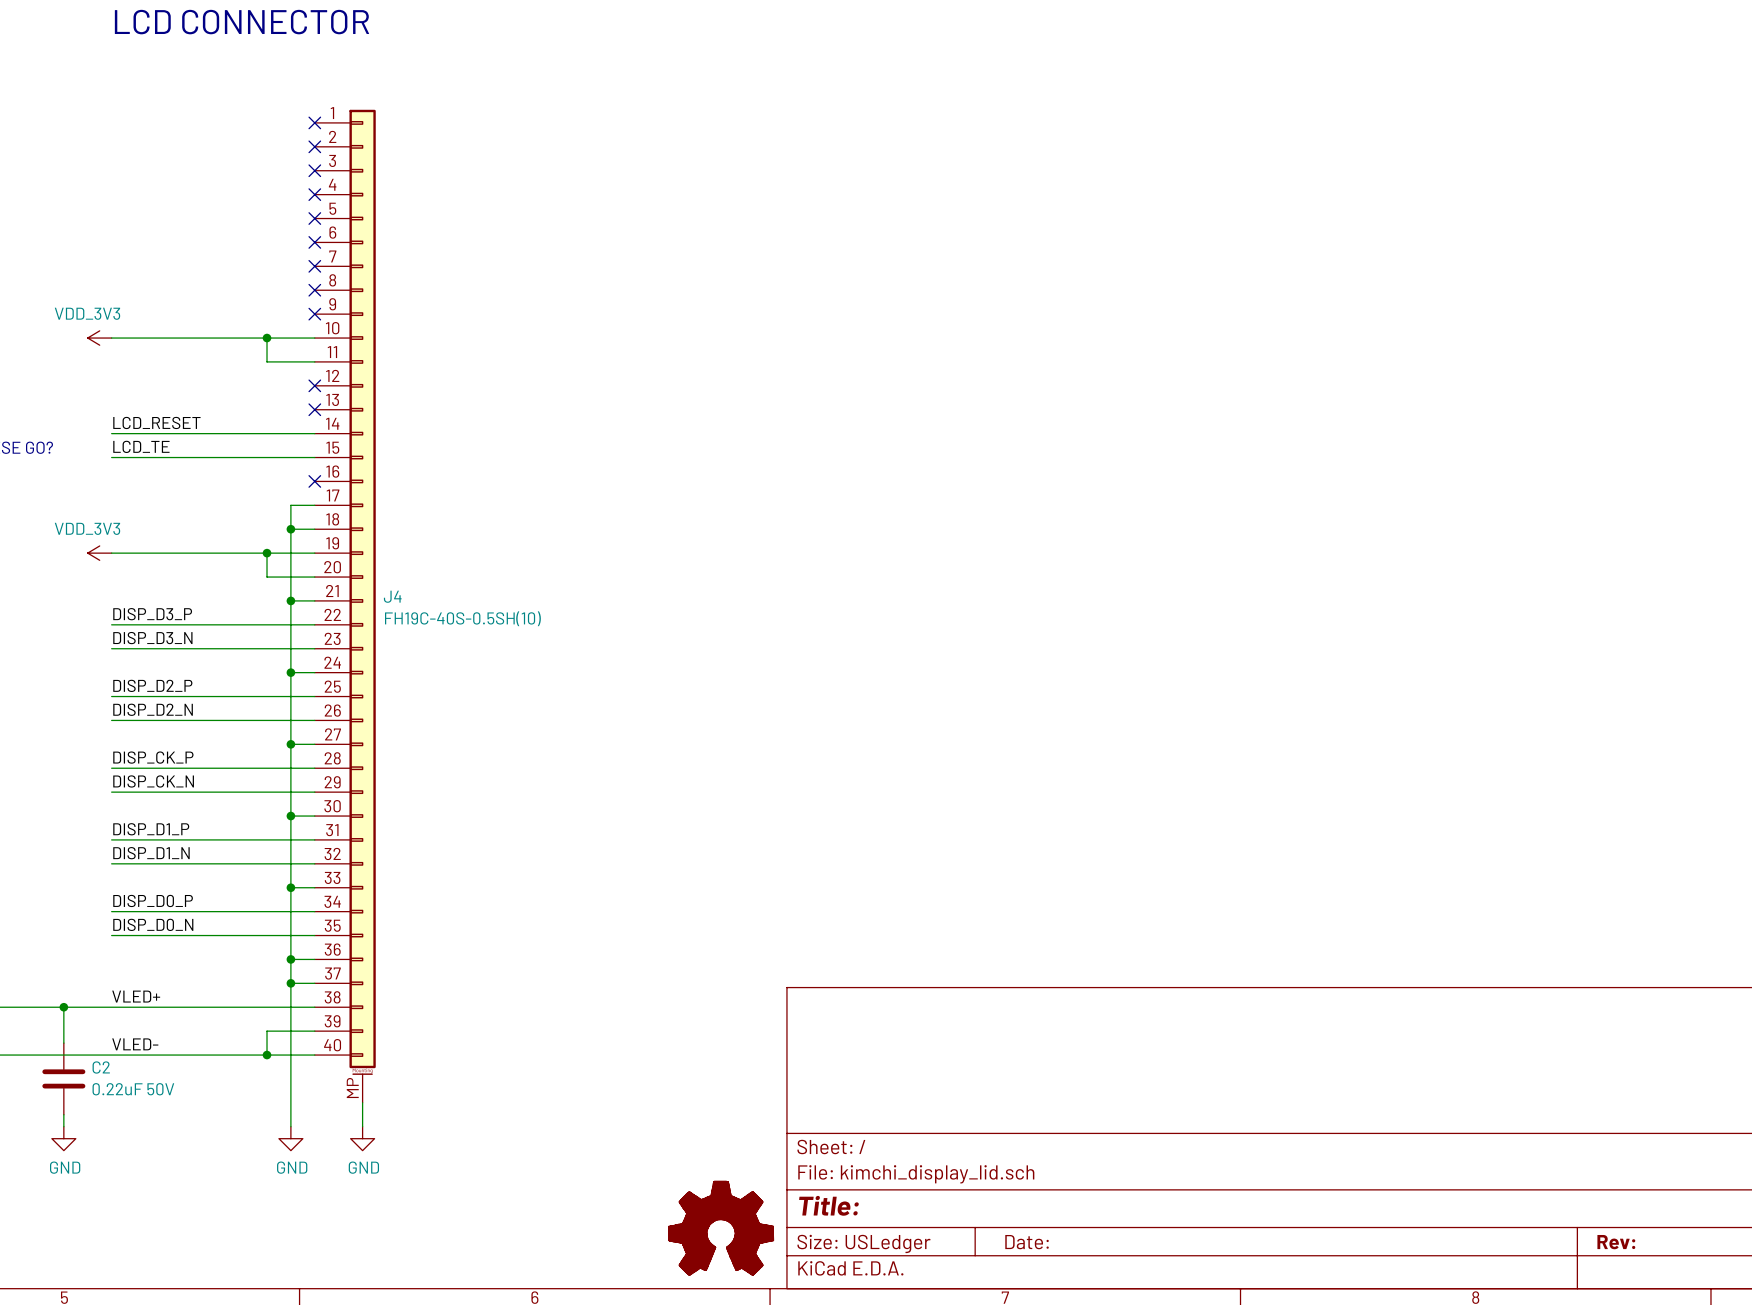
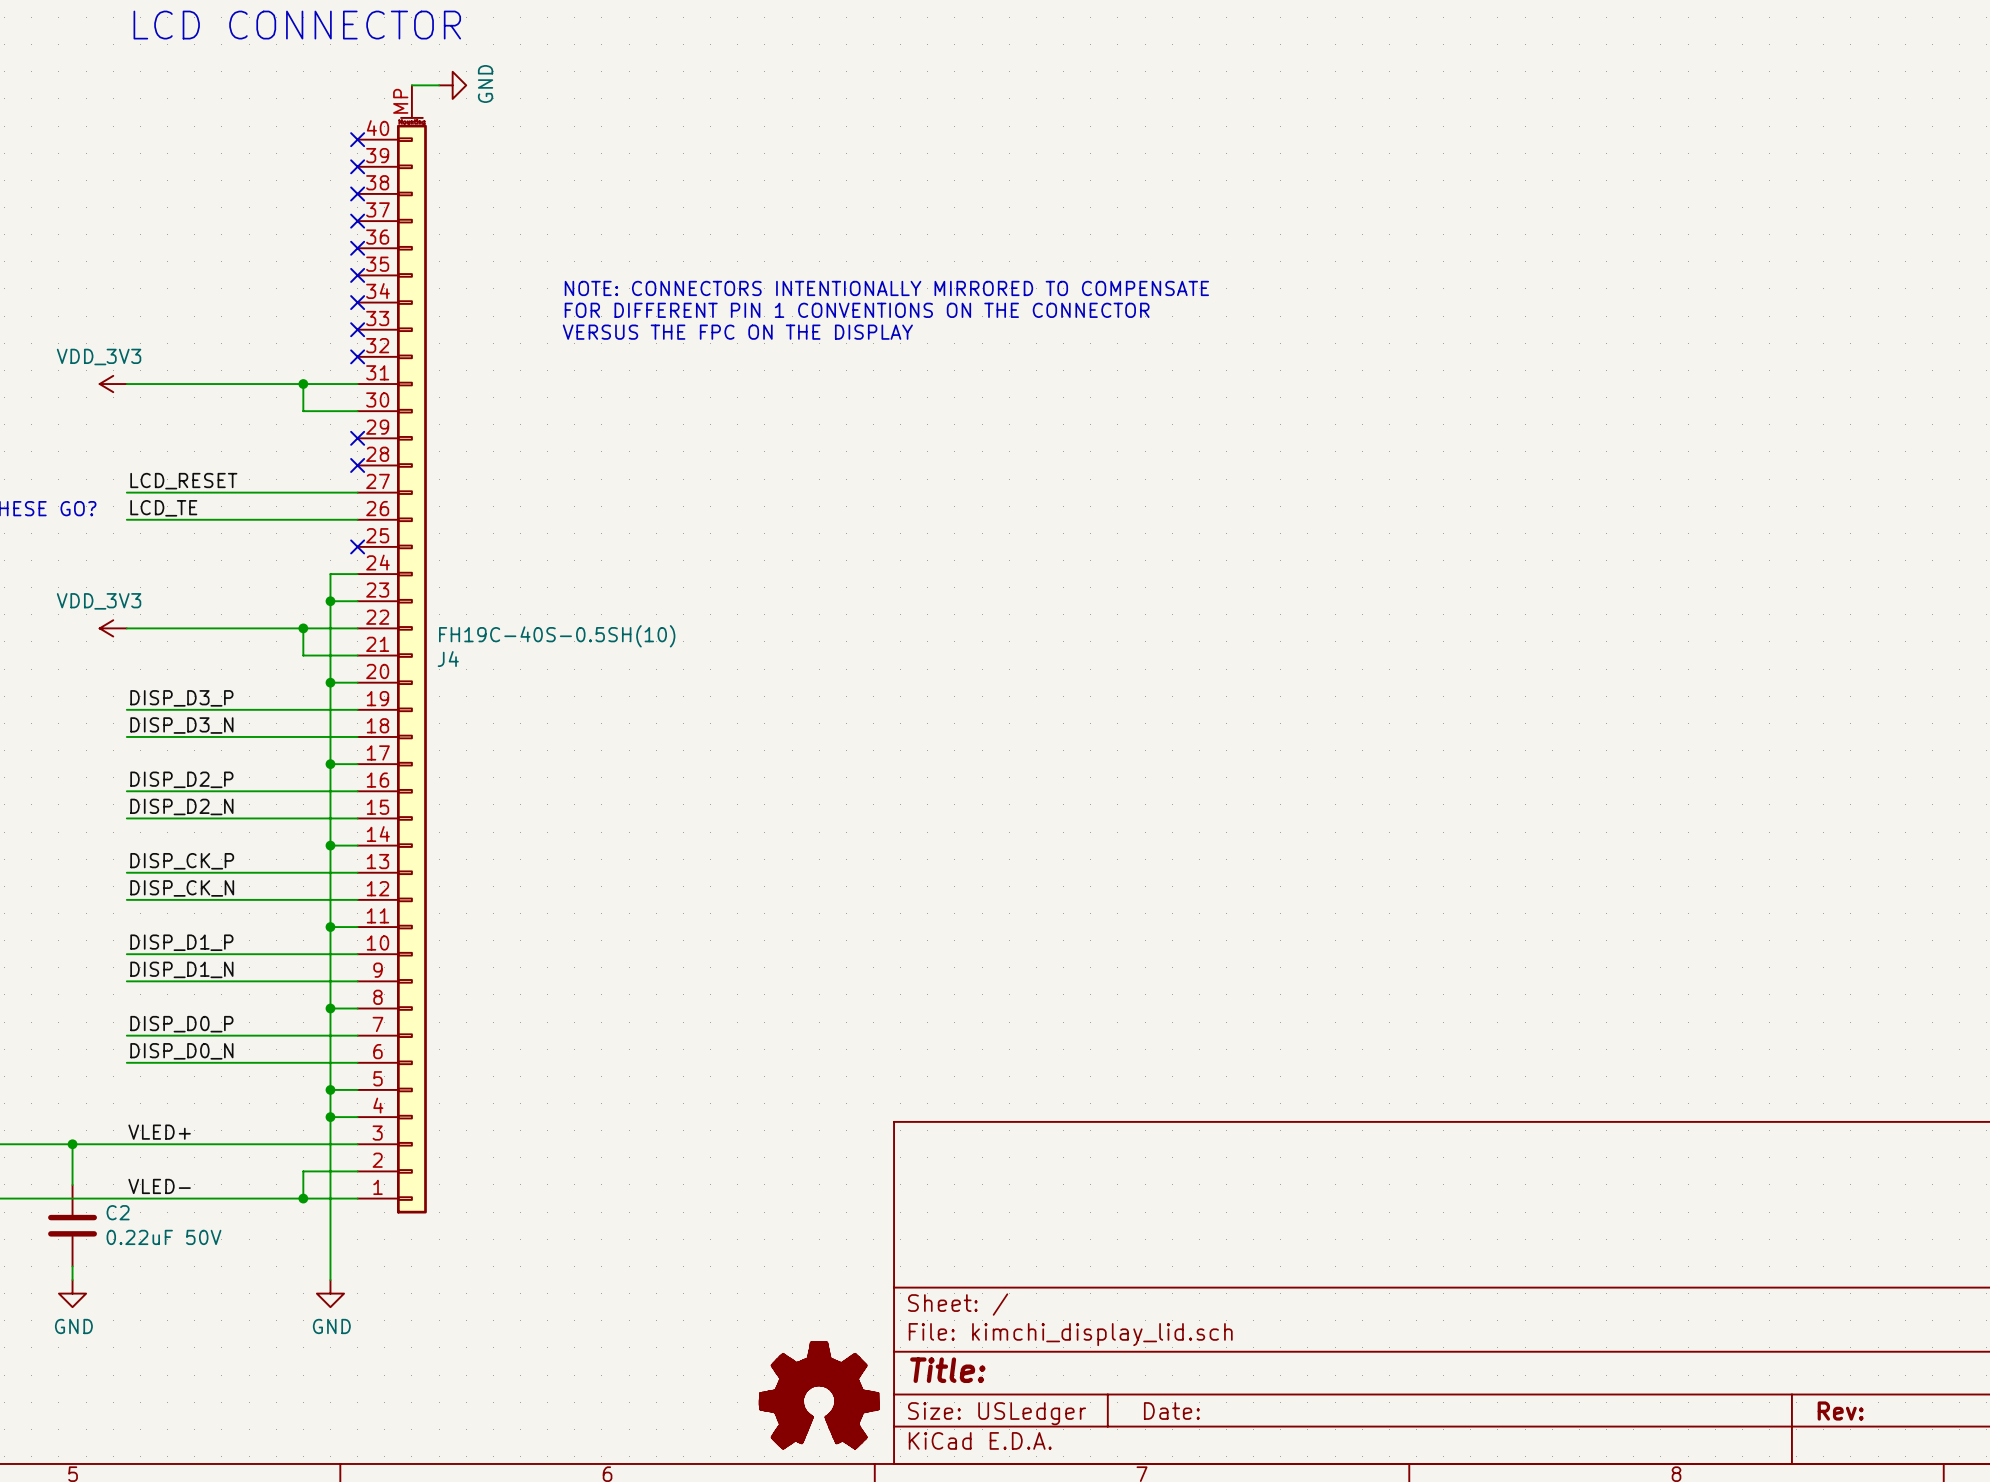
wire: none -> (411, 85) (439, 85)
power symbol: none -> GND (452, 85)
text: none -> NOTE: CONNECTORS INTENTIONALLY MIRRORED TO COMPENSATE (886, 288)
text: none -> FOR DIFFERENT PIN 1 CONVENTIONS ON THE CONNECTOR (857, 310)
text: none -> VERSUS THE FPC ON THE DISPLAY (737, 332)
J4 flip: as is (362, 592) -> up-down (411, 665)
wire: (362, 1102) (362, 1126) -> none
power symbol: GND (362, 1138) -> none

